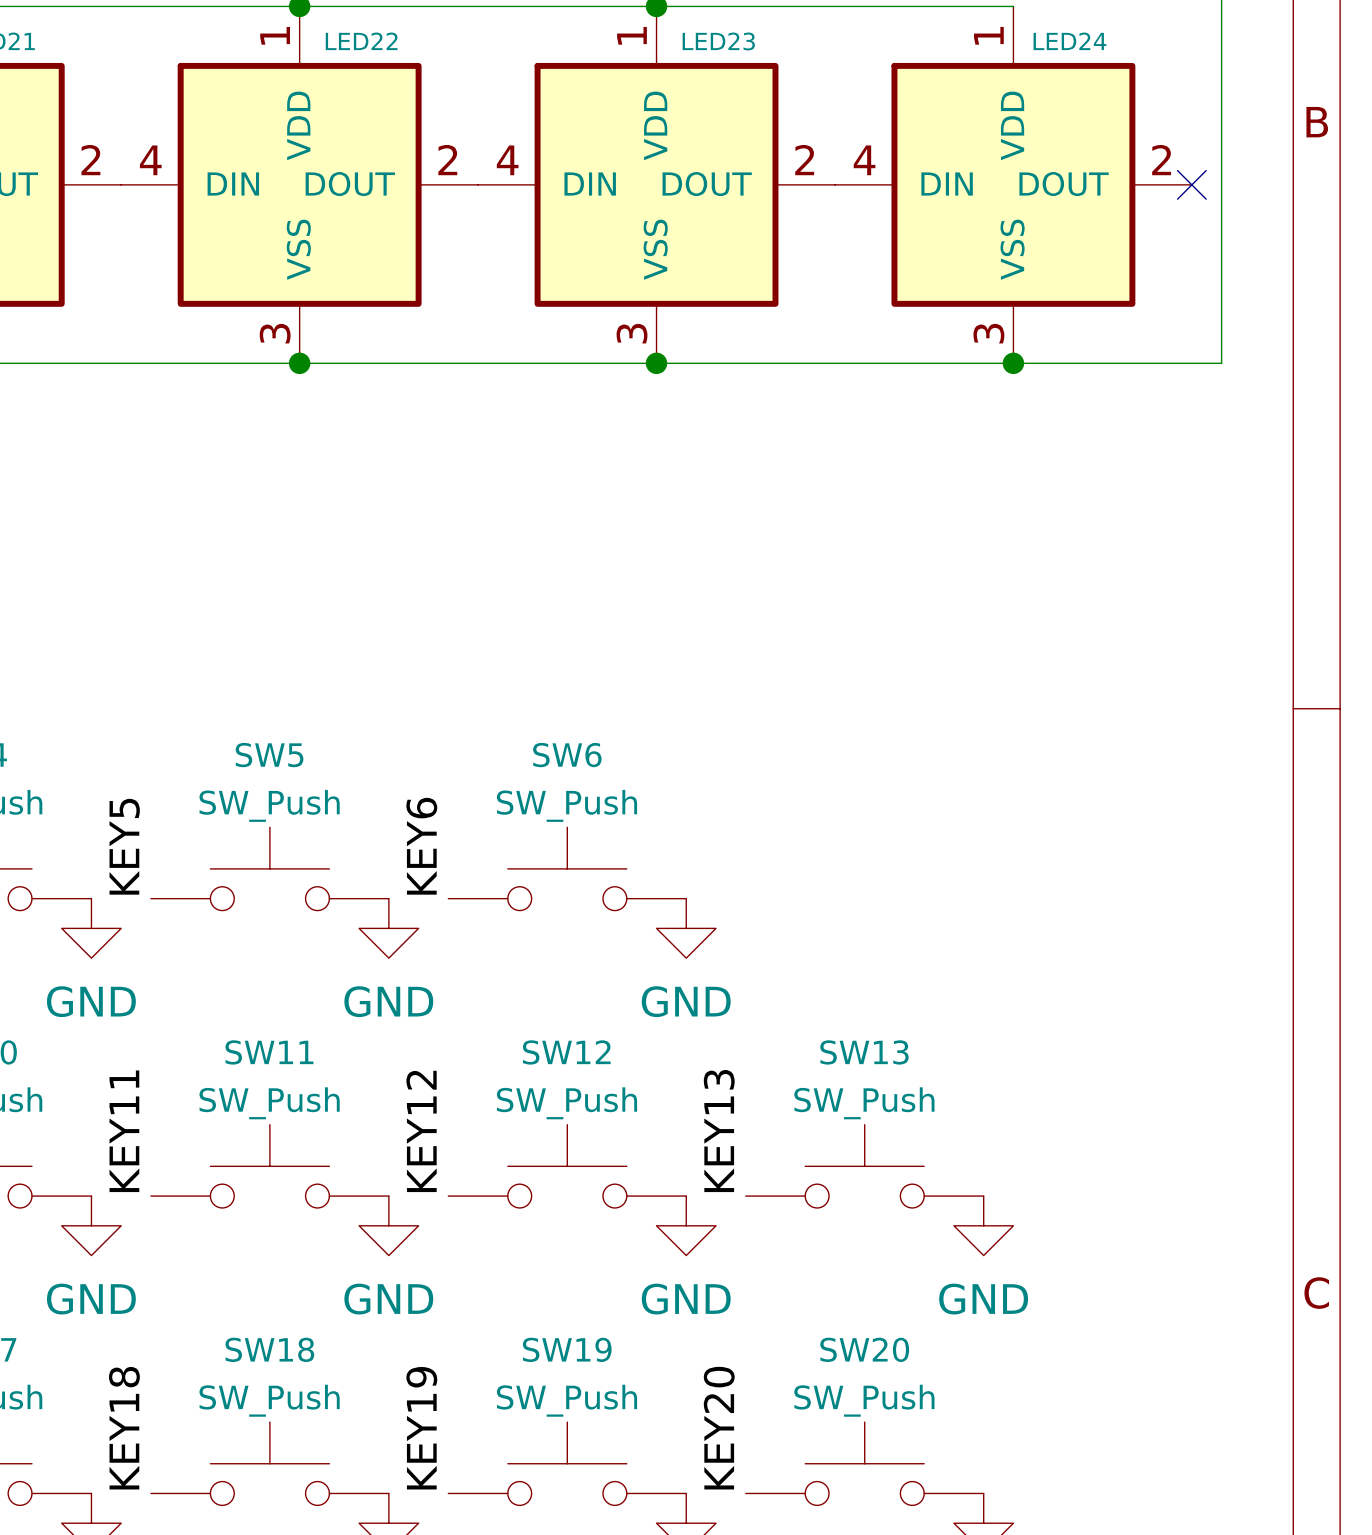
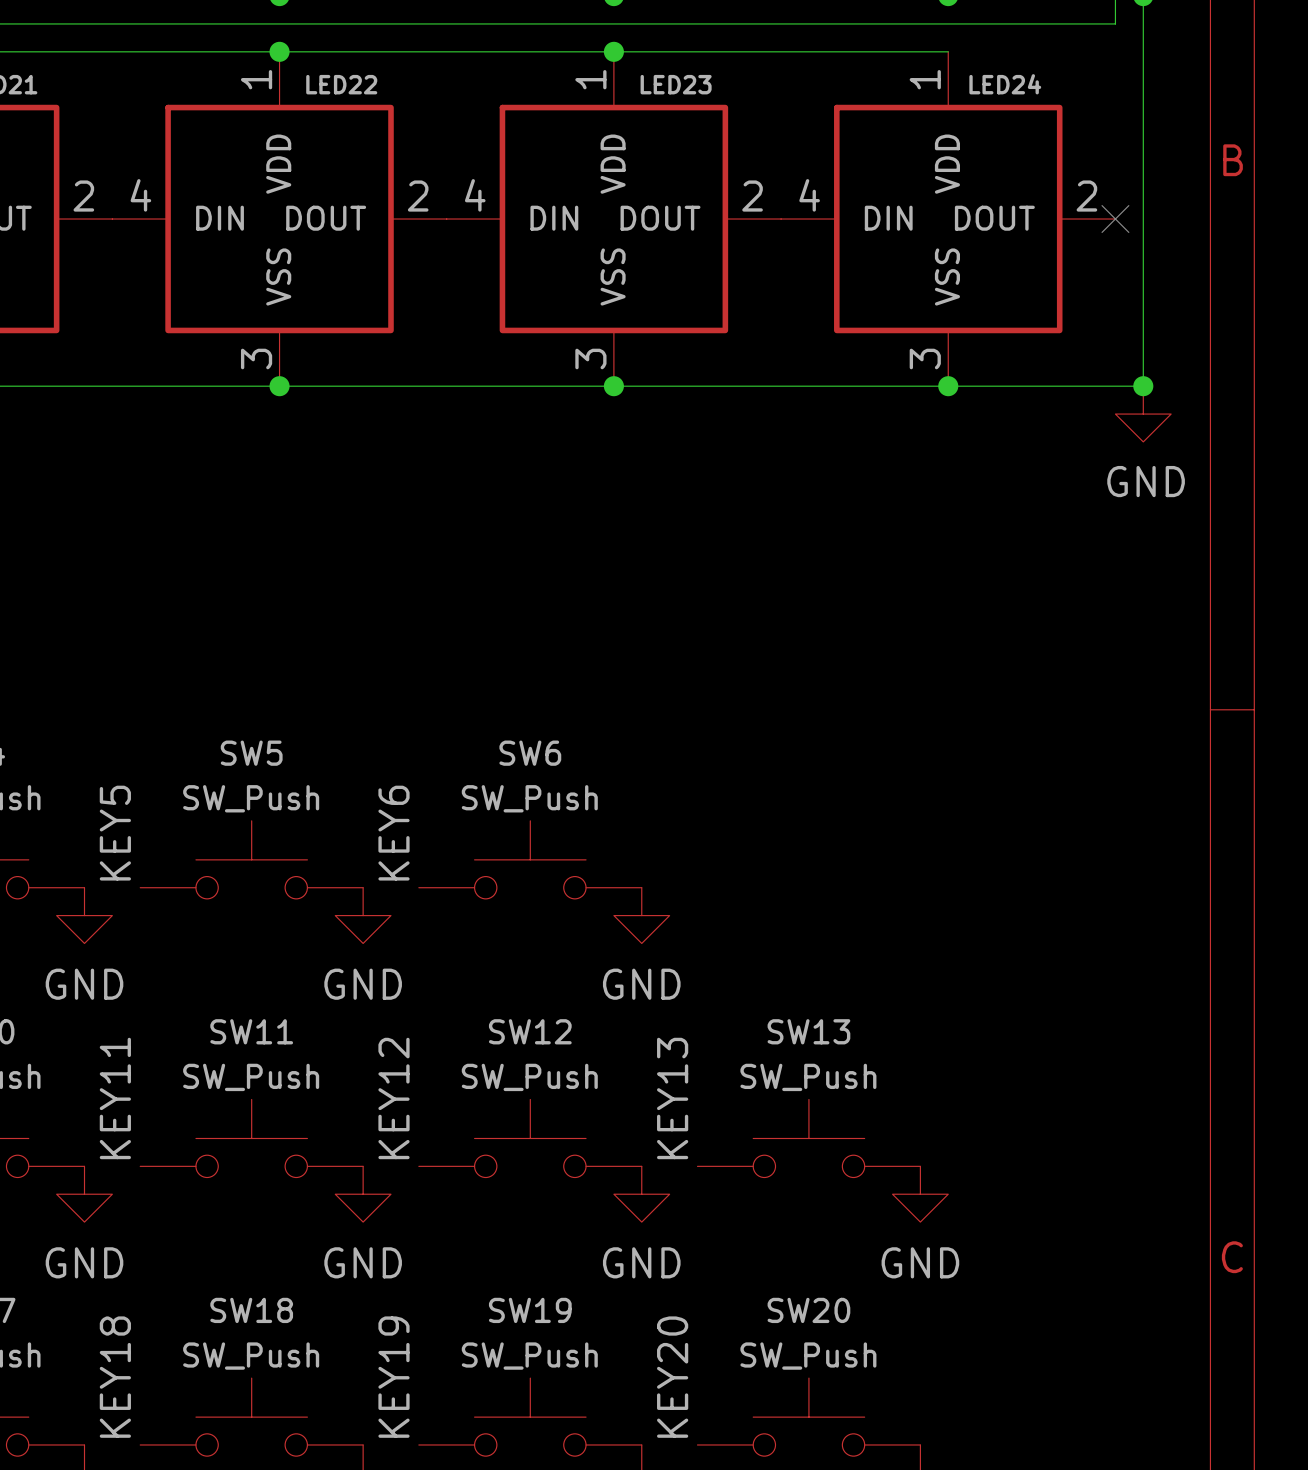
junction: none -> (1143, 386)
power symbol: none -> GND (1143, 414)

